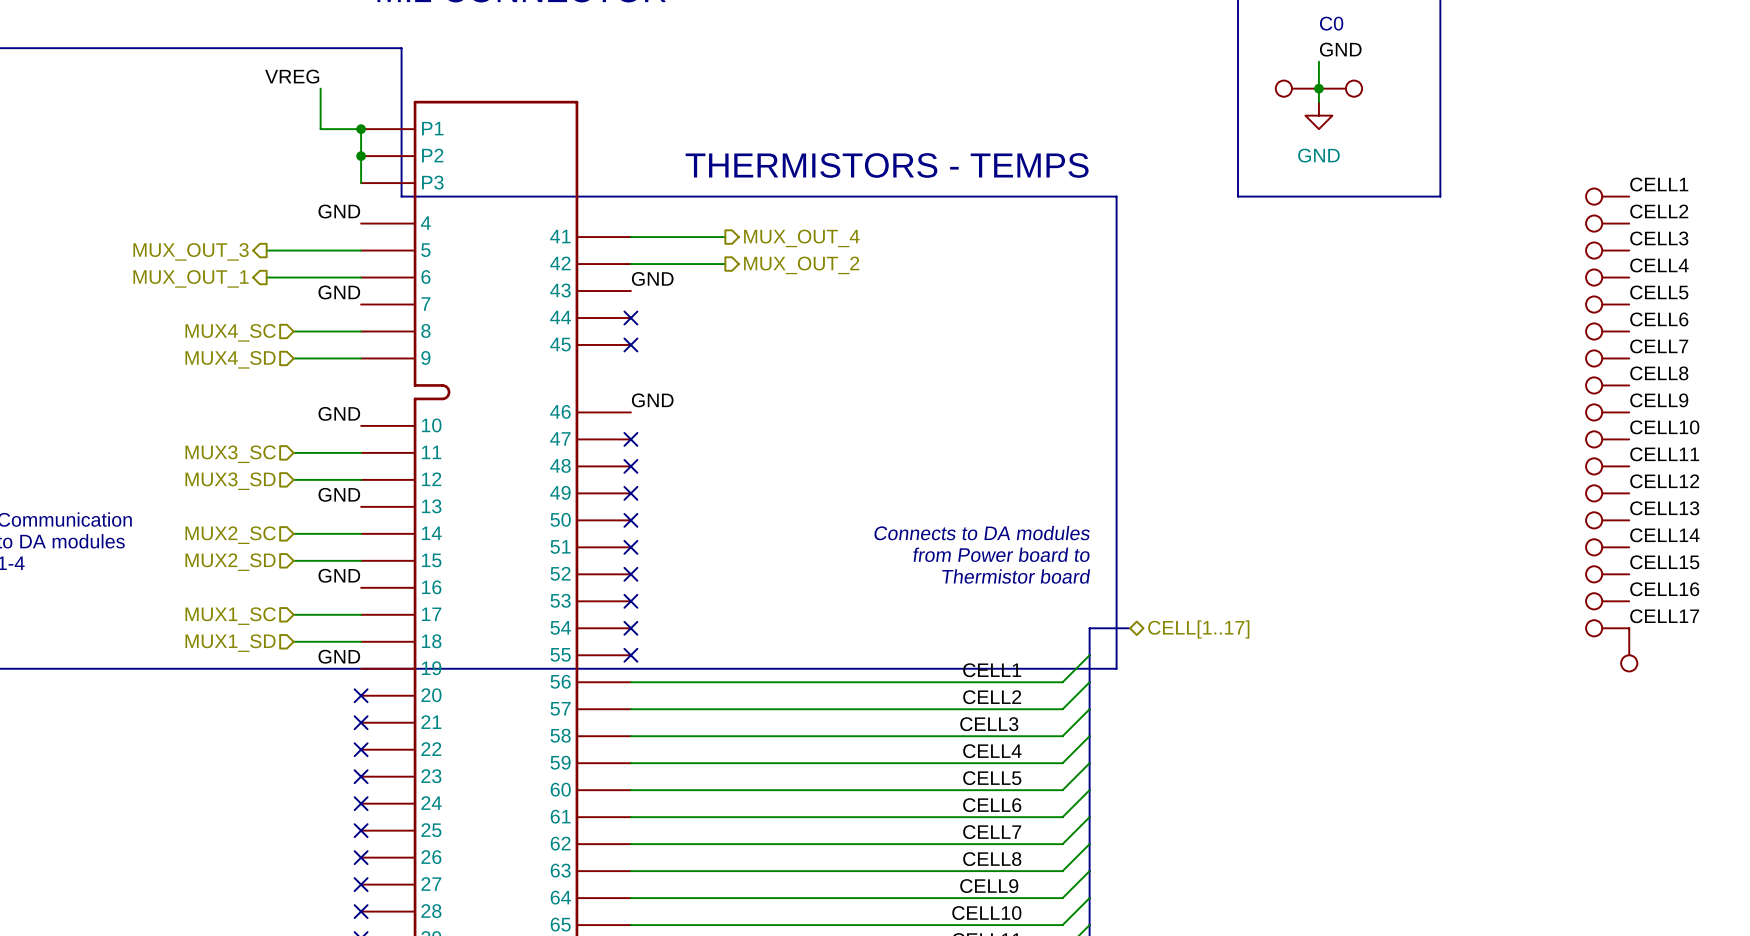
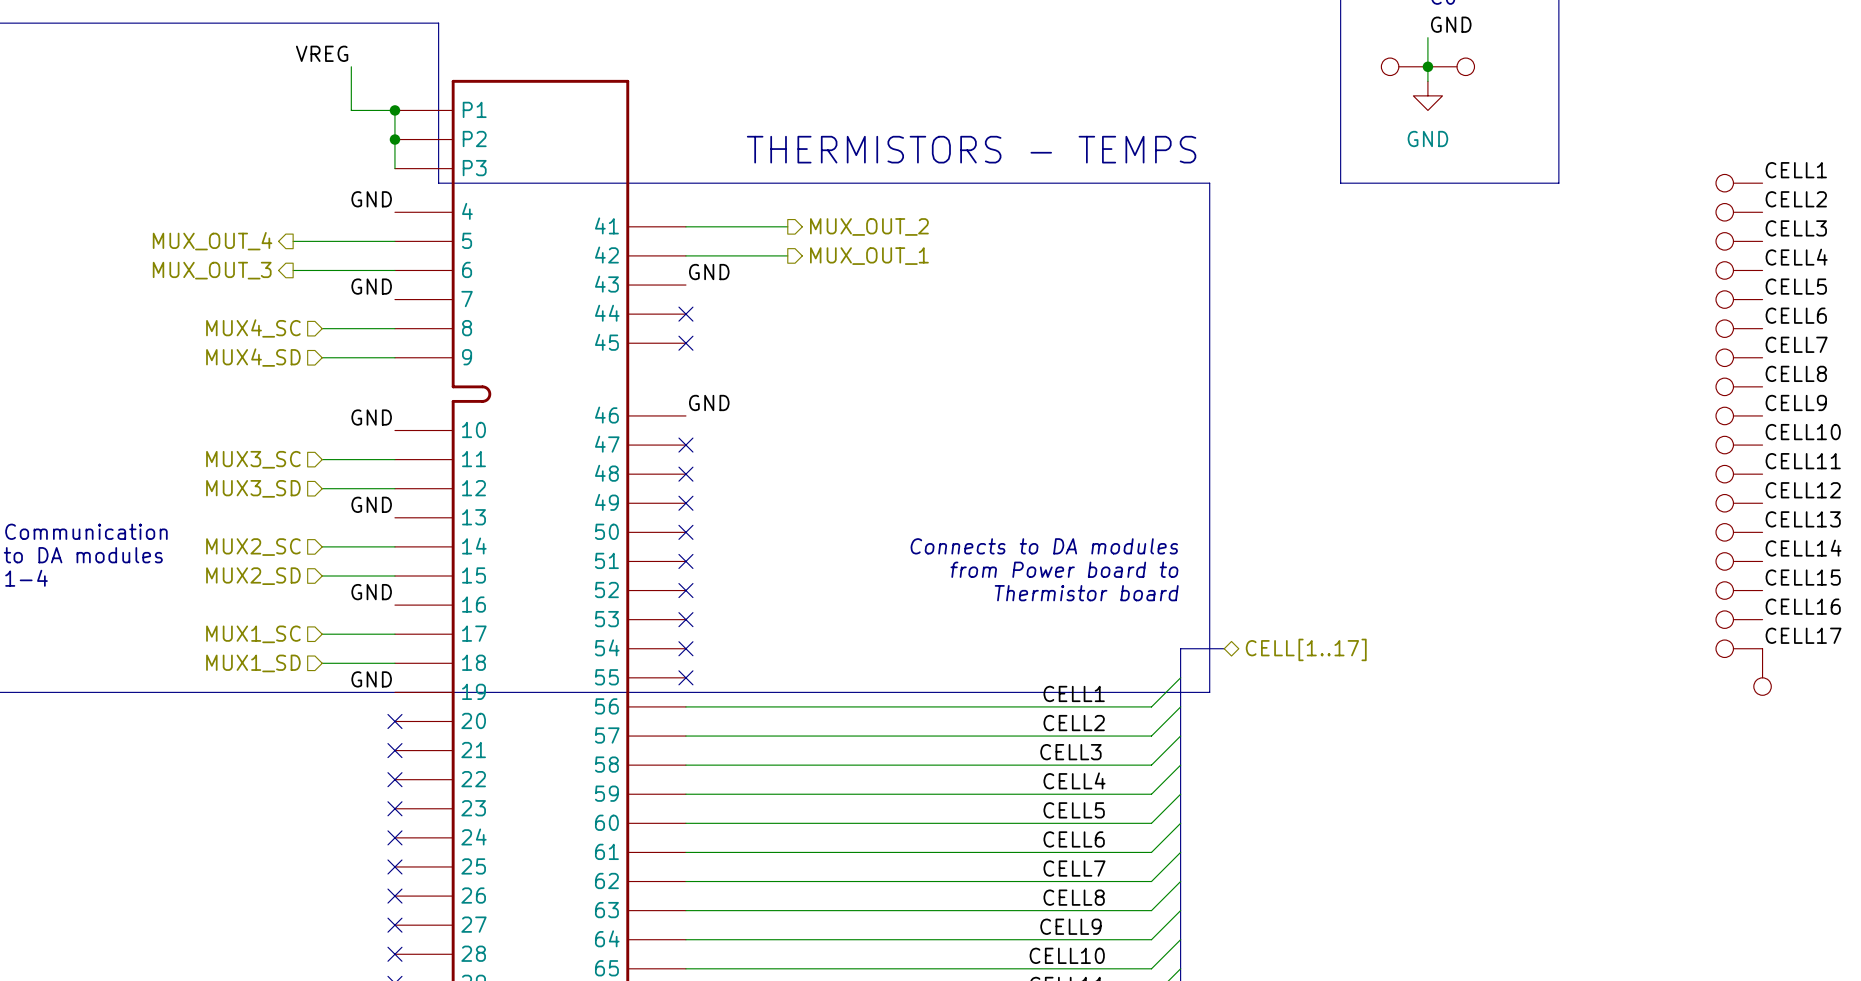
hierarchical label: MUX_OUT_4 (801, 238) -> MUX_OUT_2 (869, 226)
hierarchical label: MUX_OUT_3 (191, 251) -> MUX_OUT_4 (212, 241)
hierarchical label: MUX_OUT_2 (801, 265) -> MUX_OUT_1 (869, 256)
hierarchical label: MUX_OUT_1 (191, 278) -> MUX_OUT_3 (212, 270)

